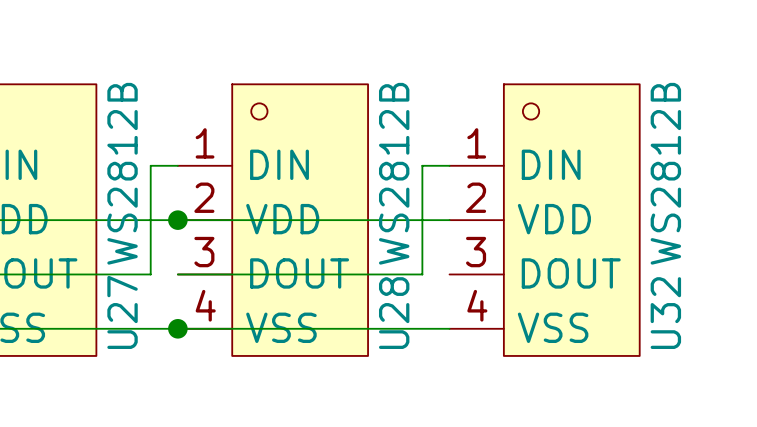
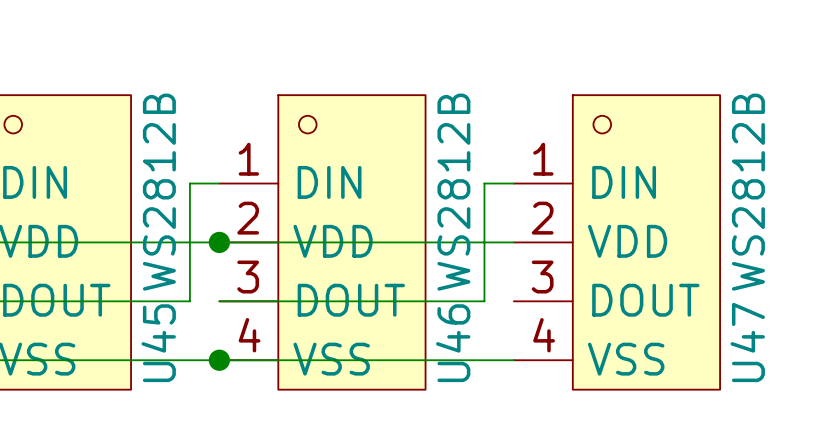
U27 name: U27 (122, 312) -> U45 (158, 343)
U28 name: U28 (394, 313) -> U46 (453, 343)
U32 name: U32 (665, 313) -> U47 (747, 342)

